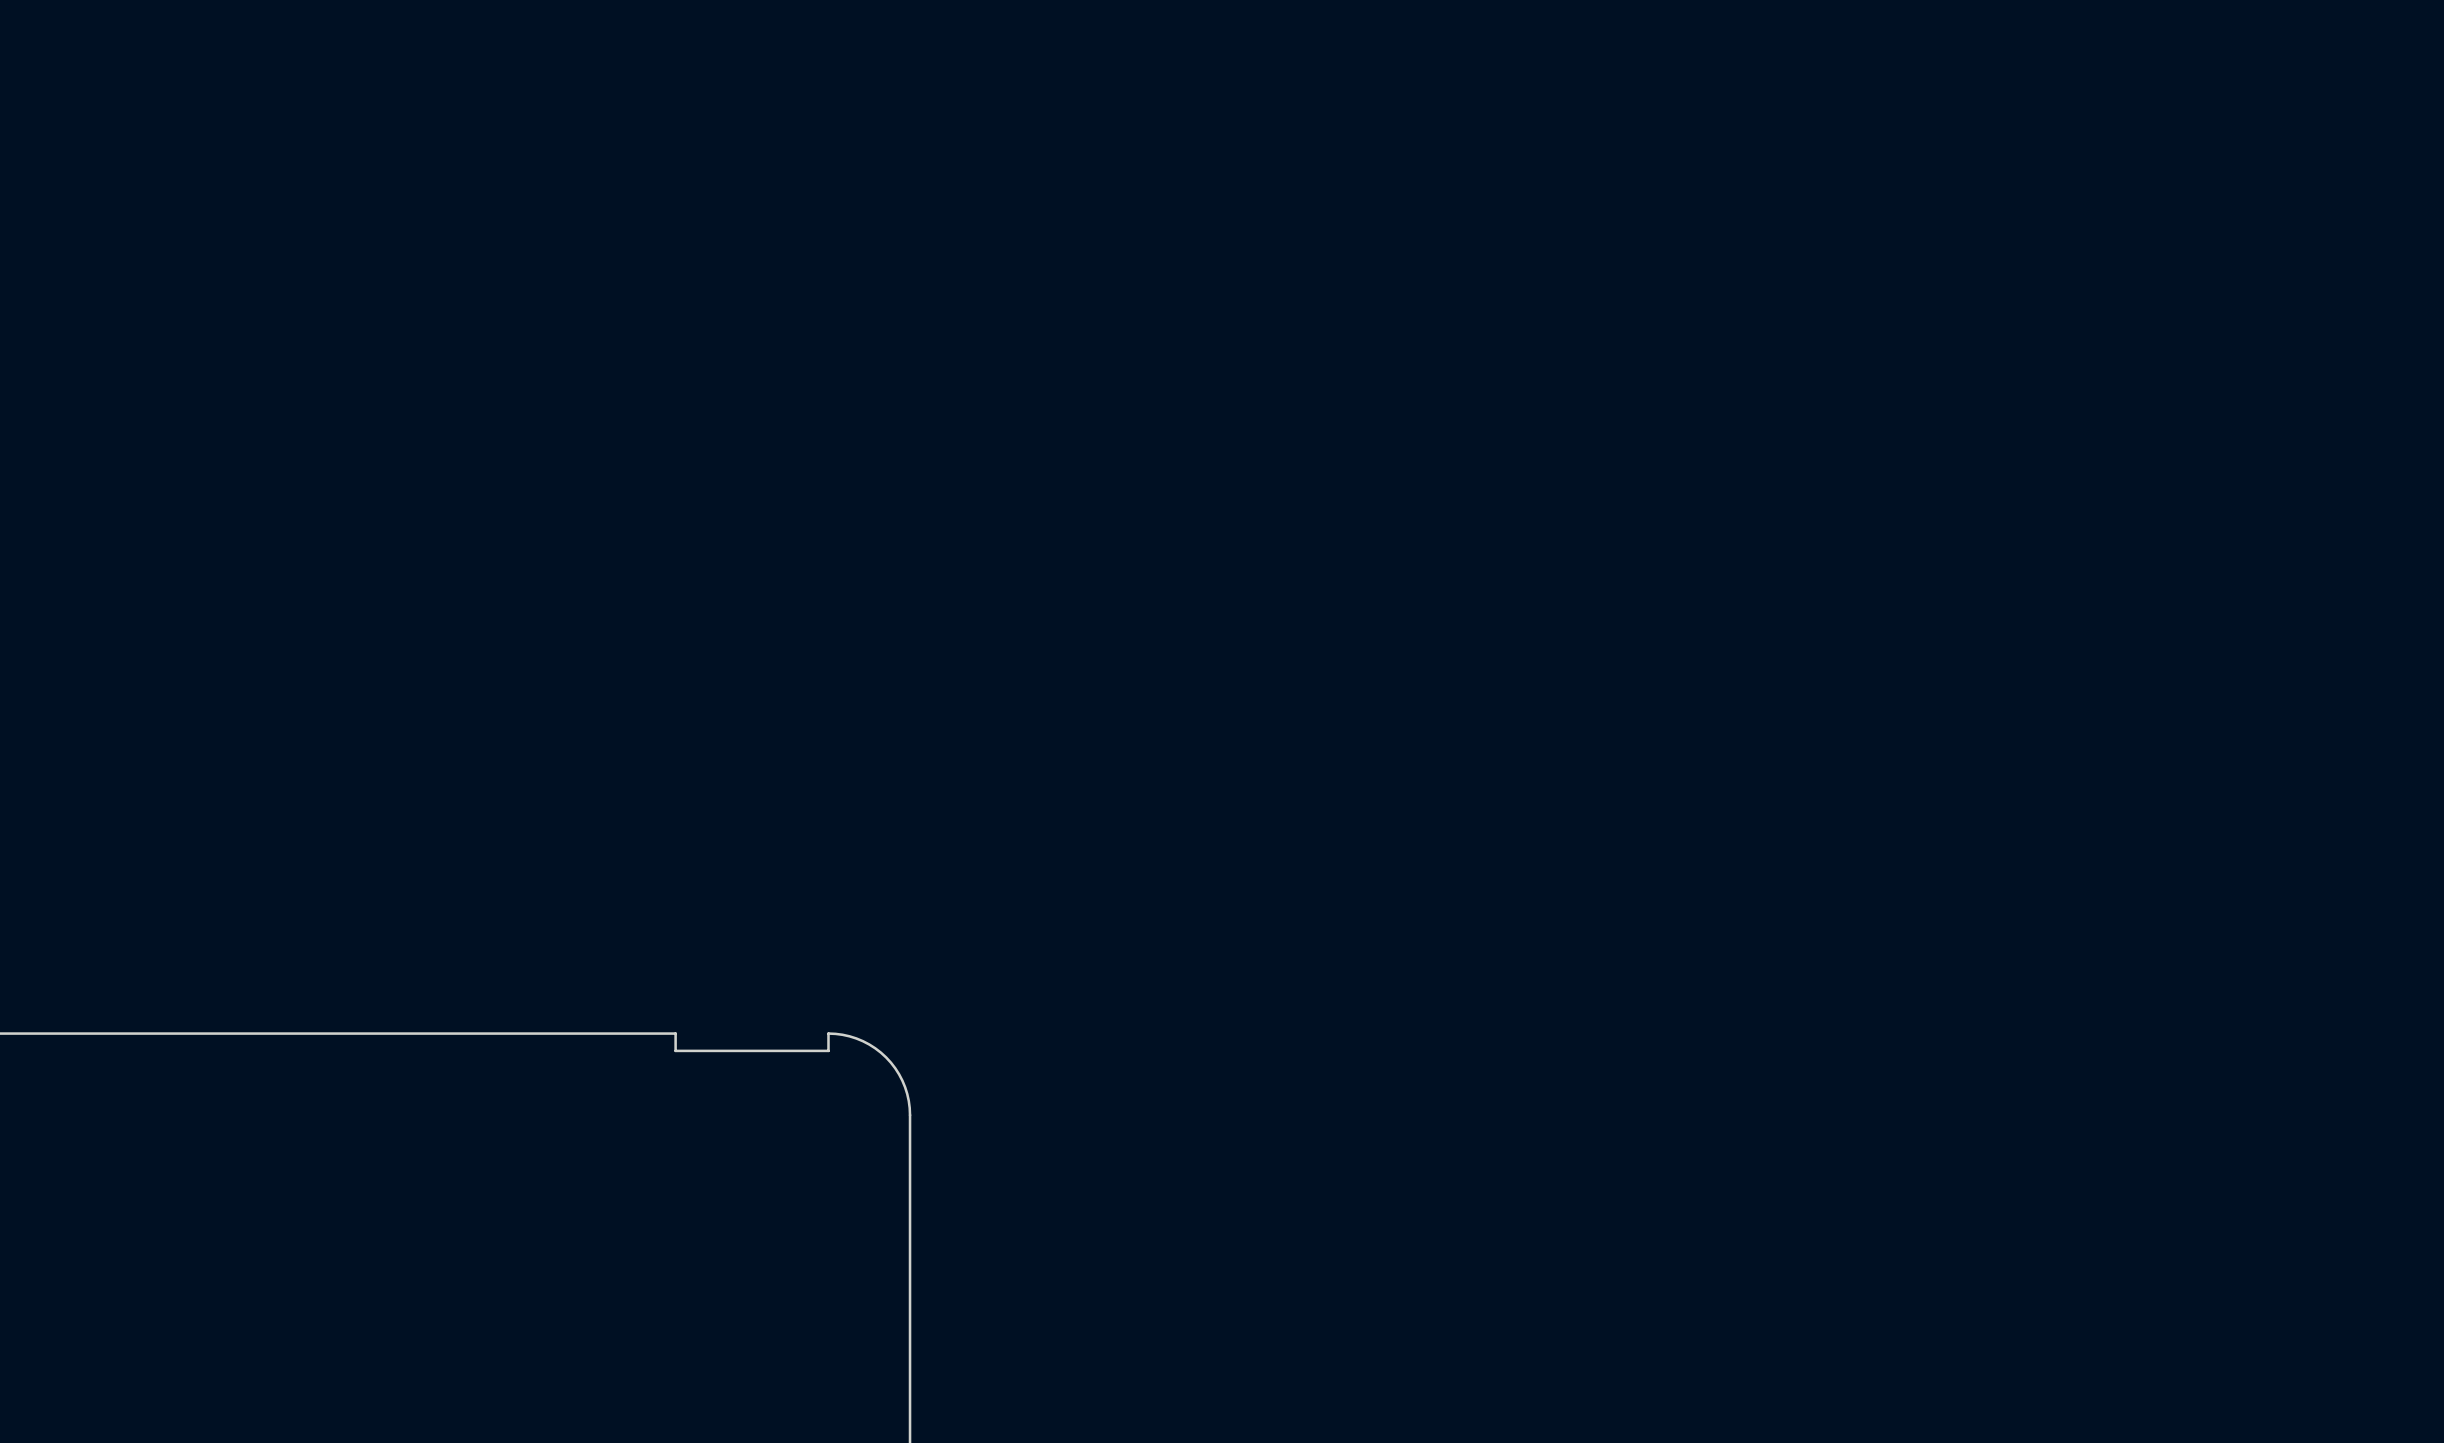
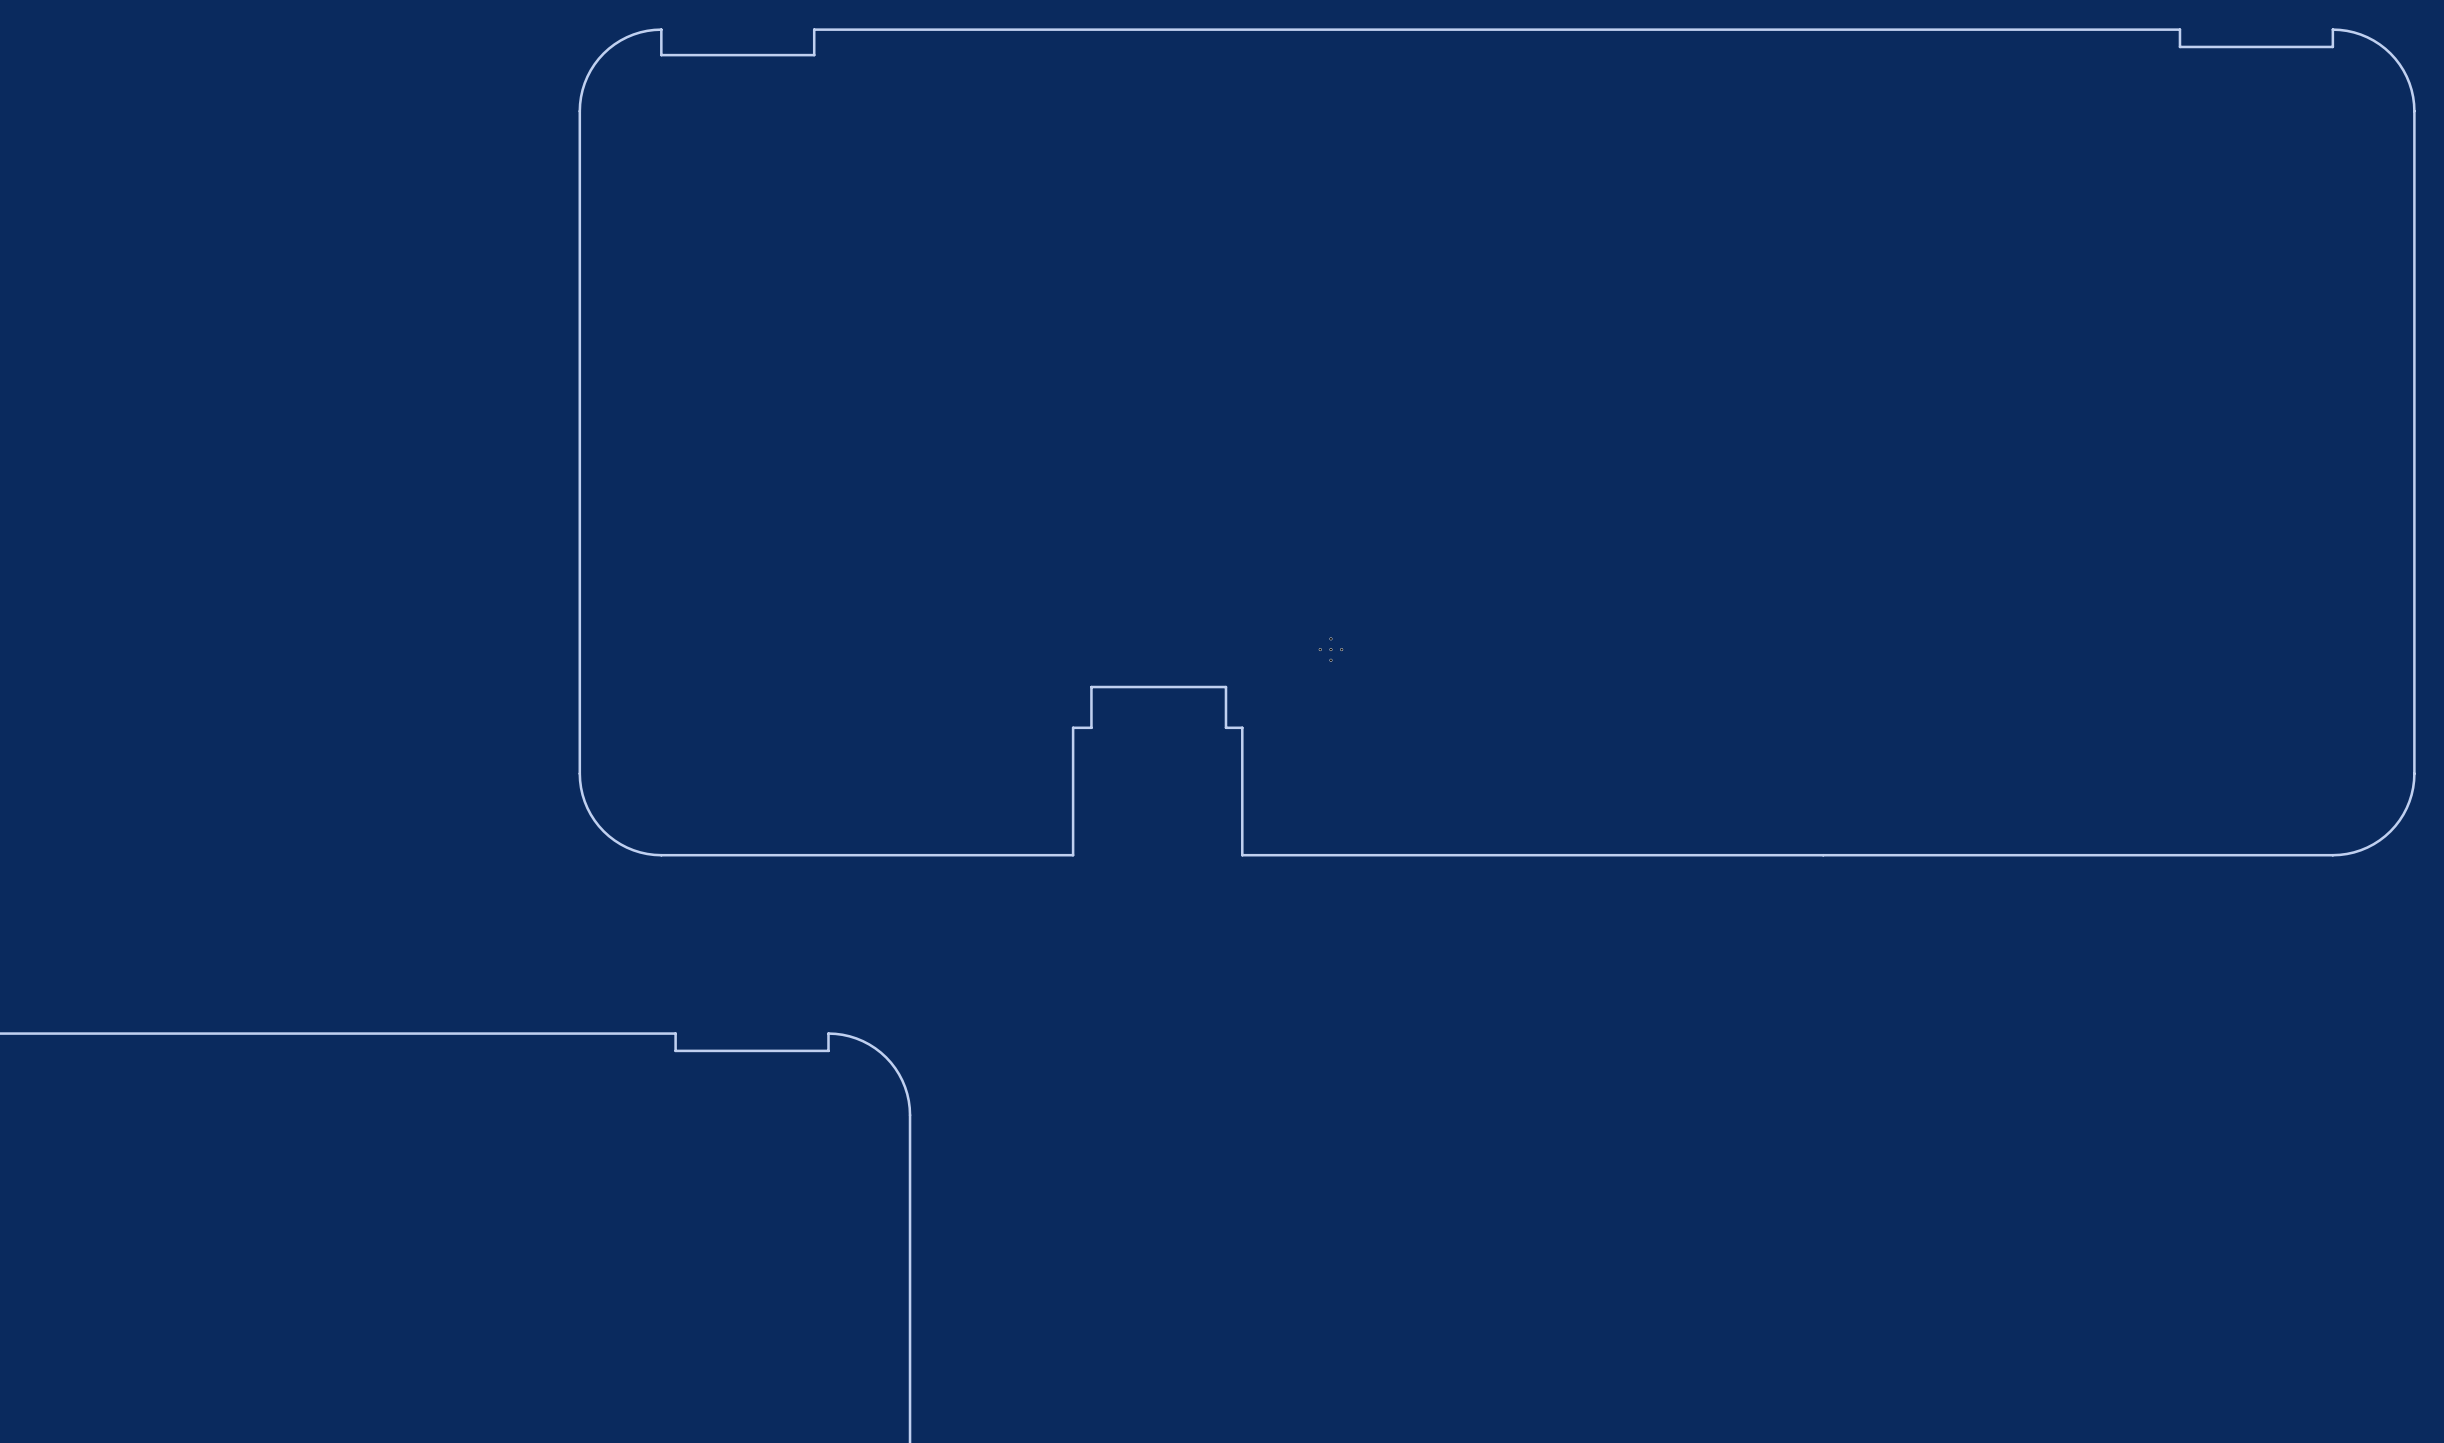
board edge: none -> (2332, 29) (2332, 46) (2179, 46) (2179, 29) (814, 29) (814, 55) (661, 55) (661, 29) (640, 32) (626, 37) (608, 48) (594, 64) (584, 83) (580, 104) (579, 773) (582, 794) (587, 808) (598, 826) (614, 840) (633, 850) (654, 854) (1073, 855) (1073, 727) (1091, 727) (1091, 687) (1225, 687) (1225, 727) (1242, 727) (1242, 855) (2332, 855) (2353, 852) (2367, 847) (2385, 836) (2399, 820) (2409, 801) (2414, 780) (2414, 111) (2409, 83) (2399, 64) (2390, 53) (2367, 37) (2353, 32) (2332, 29)
part: none -> (1330, 649)

